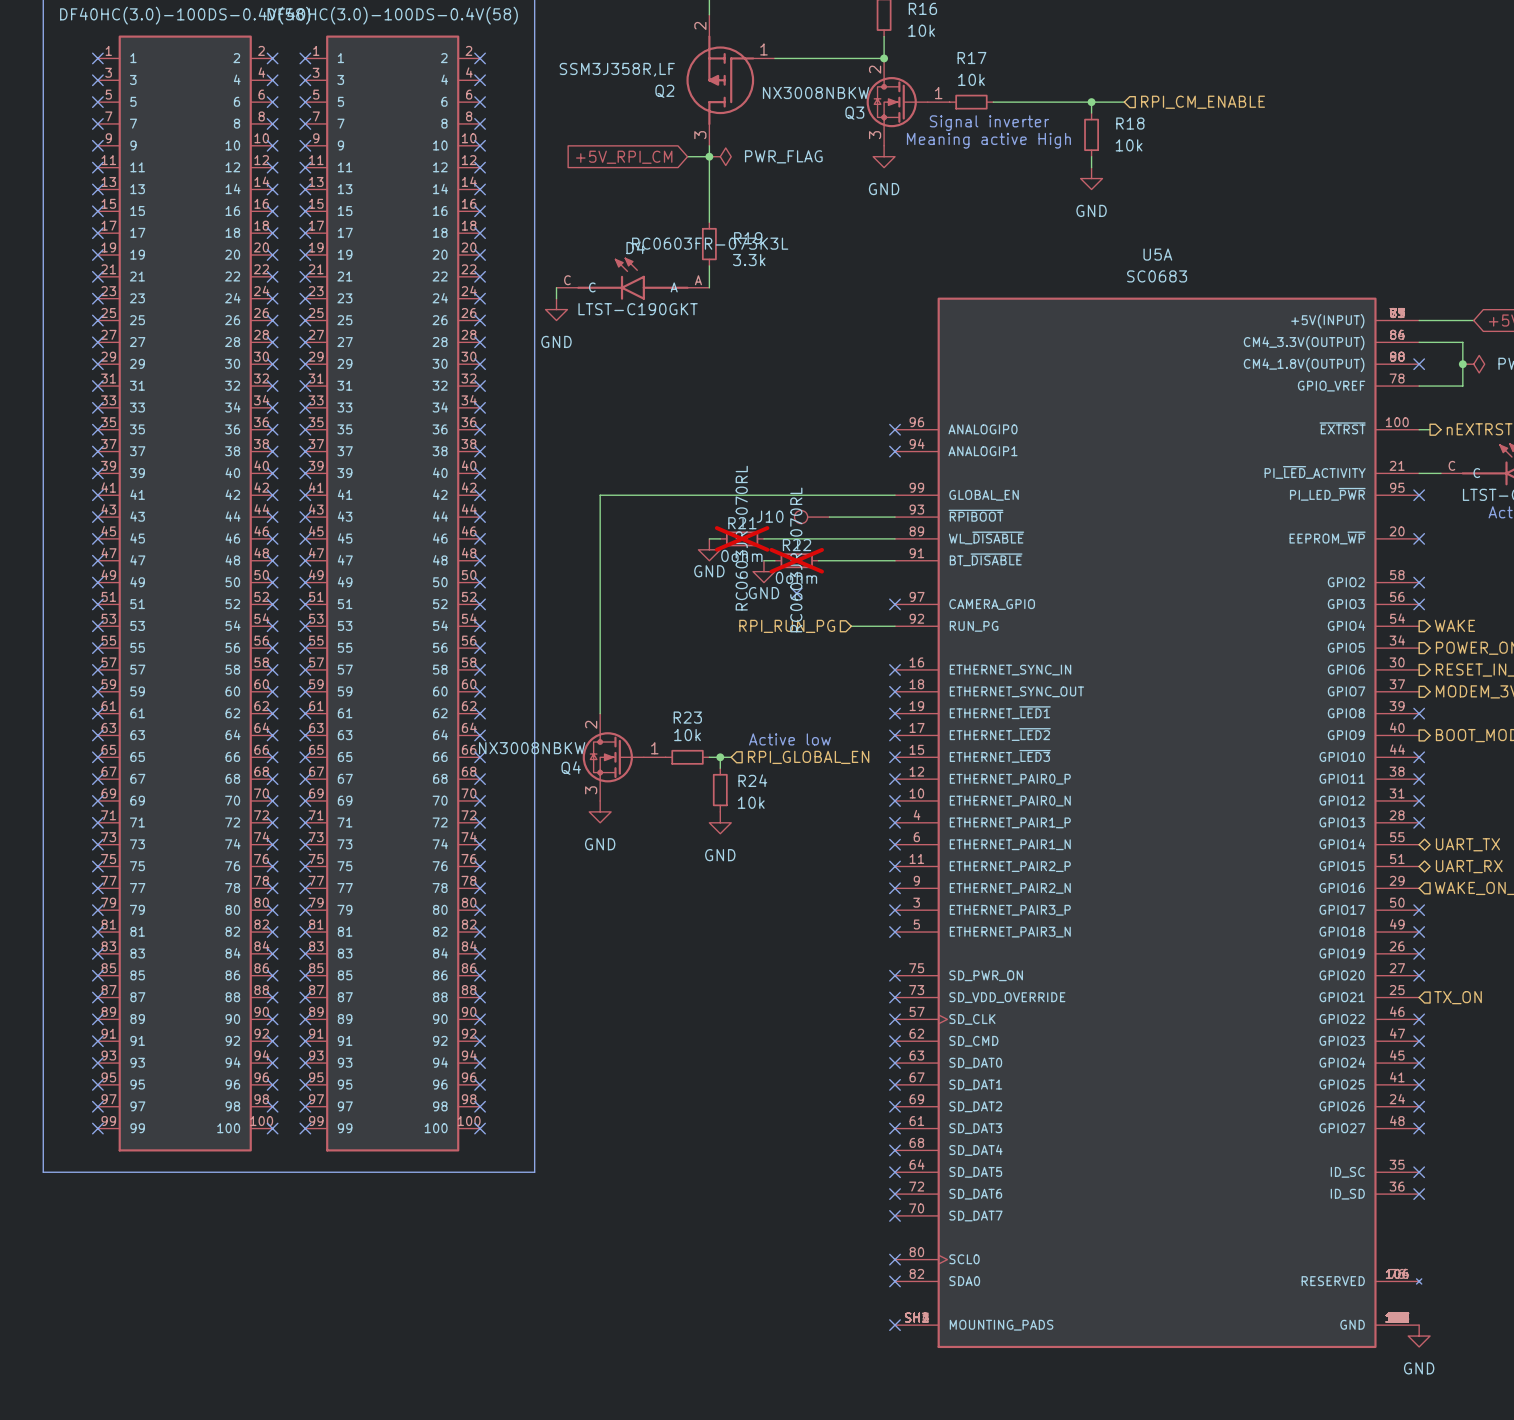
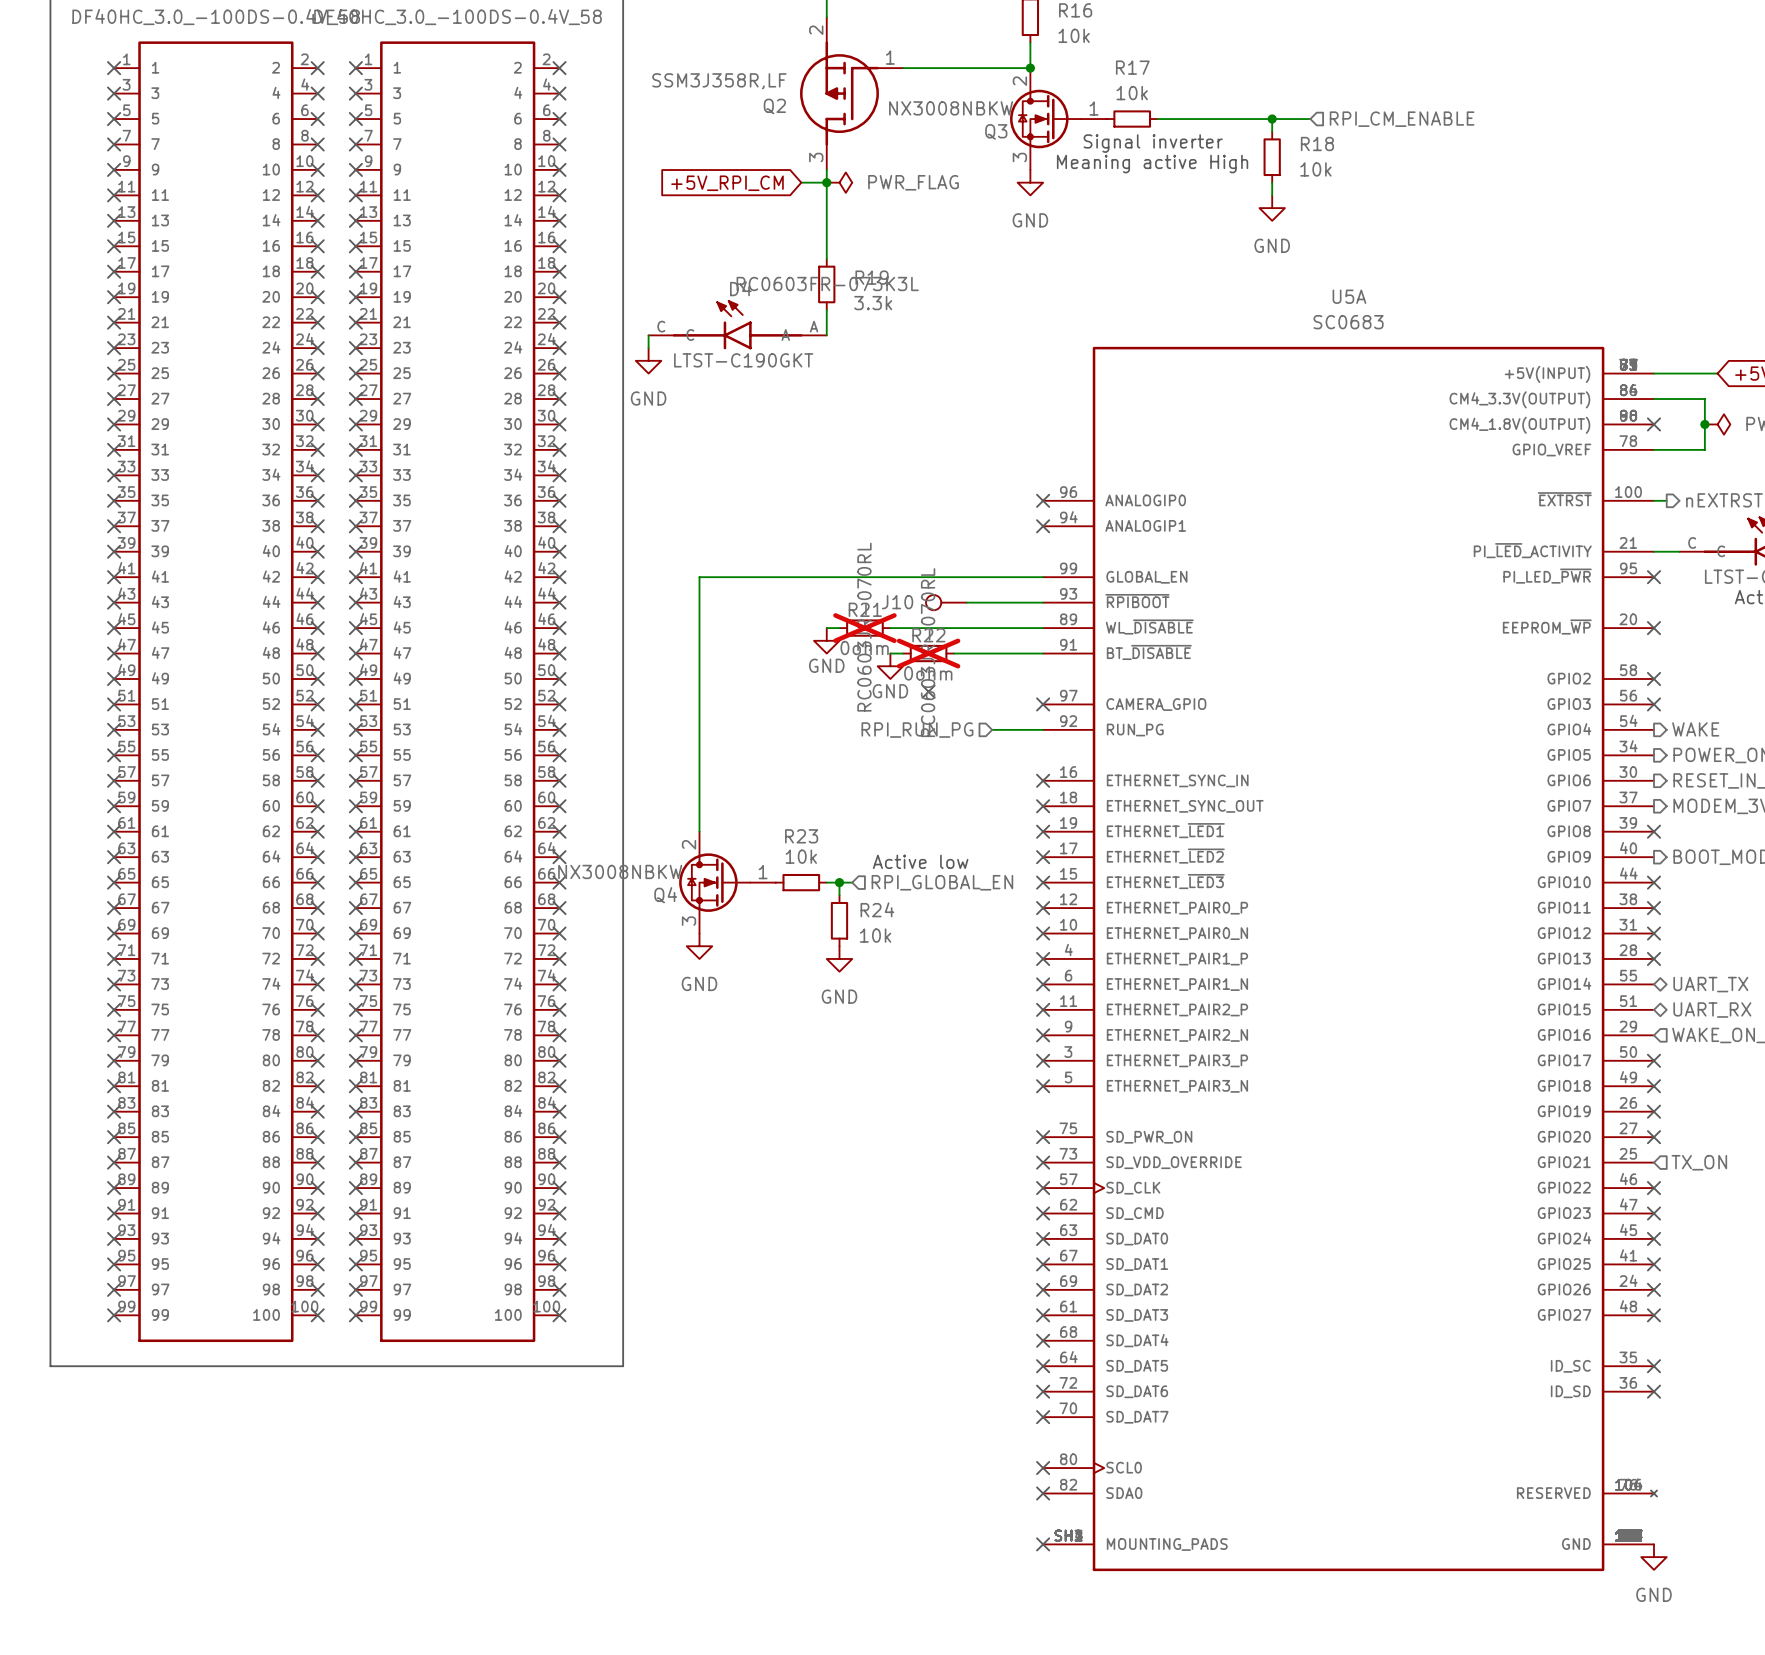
part value: DF40HC(3.0)-100DS-0.4V(58) (185, 15) -> DF40HC_3.0_-100DS-0.4V_58 (216, 17)
part value: DF40HC(3.0)-100DS-0.4V(58) (392, 15) -> DF40HC_3.0_-100DS-0.4V_58 (457, 17)

